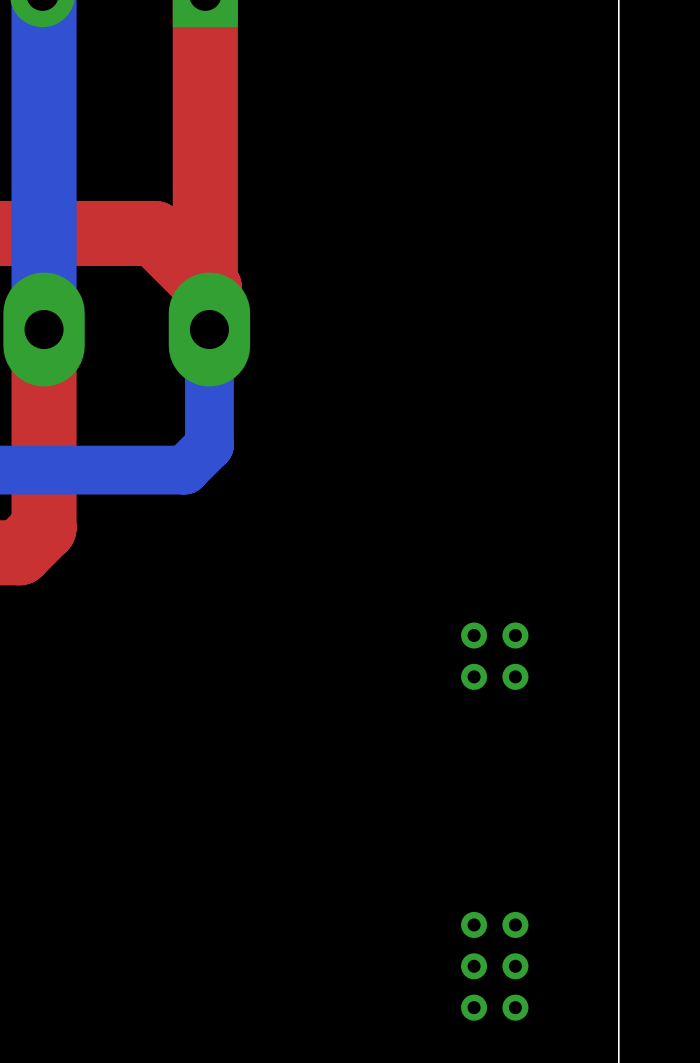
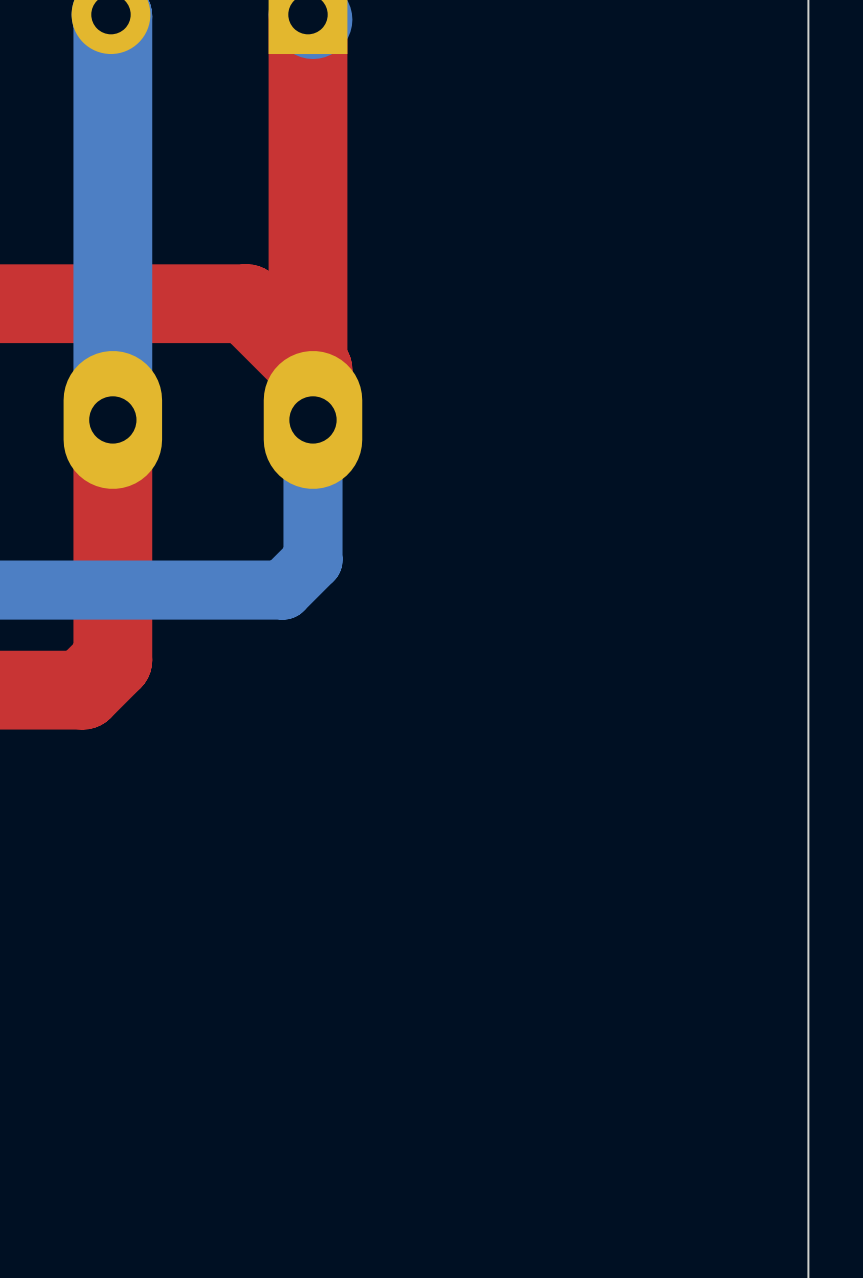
via: (474, 635) -> none
via: (515, 635) -> none
via: (474, 676) -> none
via: (515, 676) -> none
via: (474, 924) -> none
via: (515, 924) -> none
via: (474, 966) -> none
via: (515, 966) -> none
via: (474, 1007) -> none
via: (515, 1007) -> none

